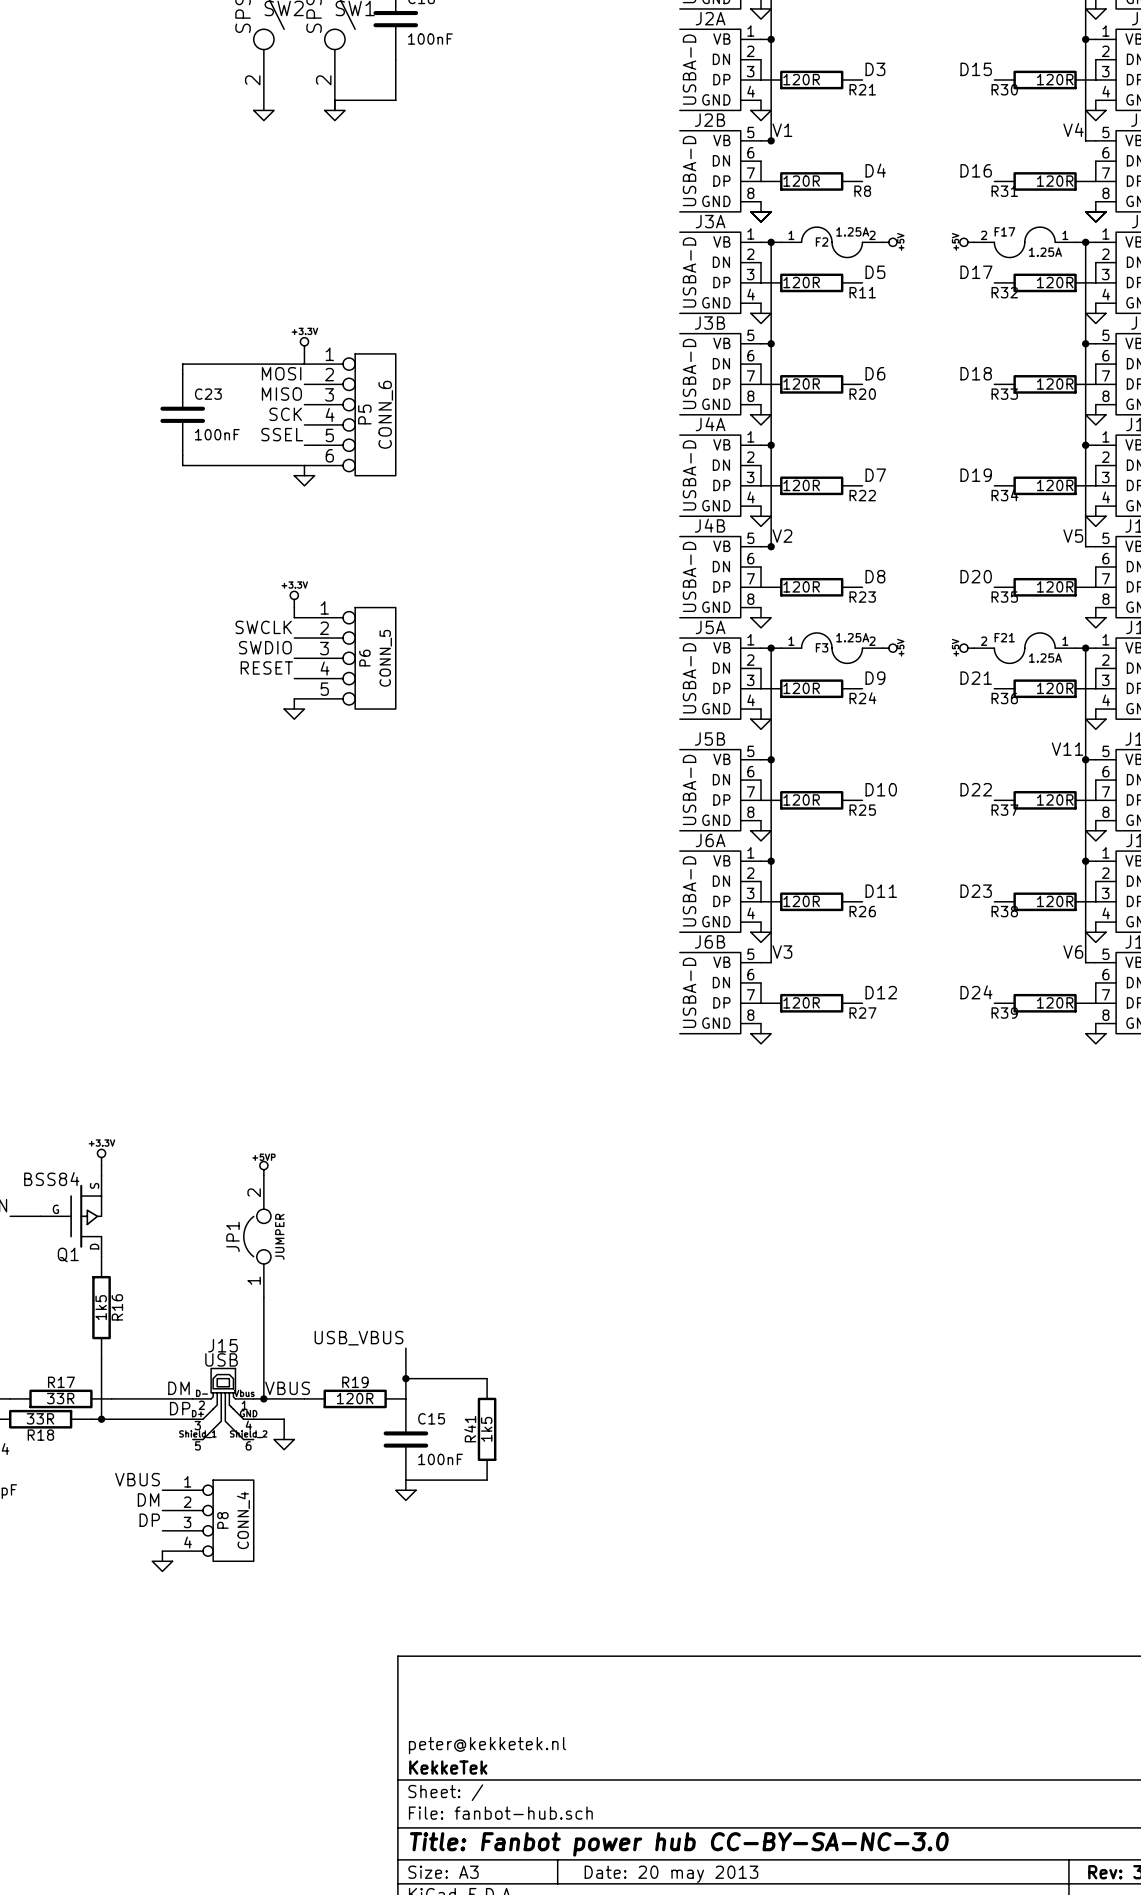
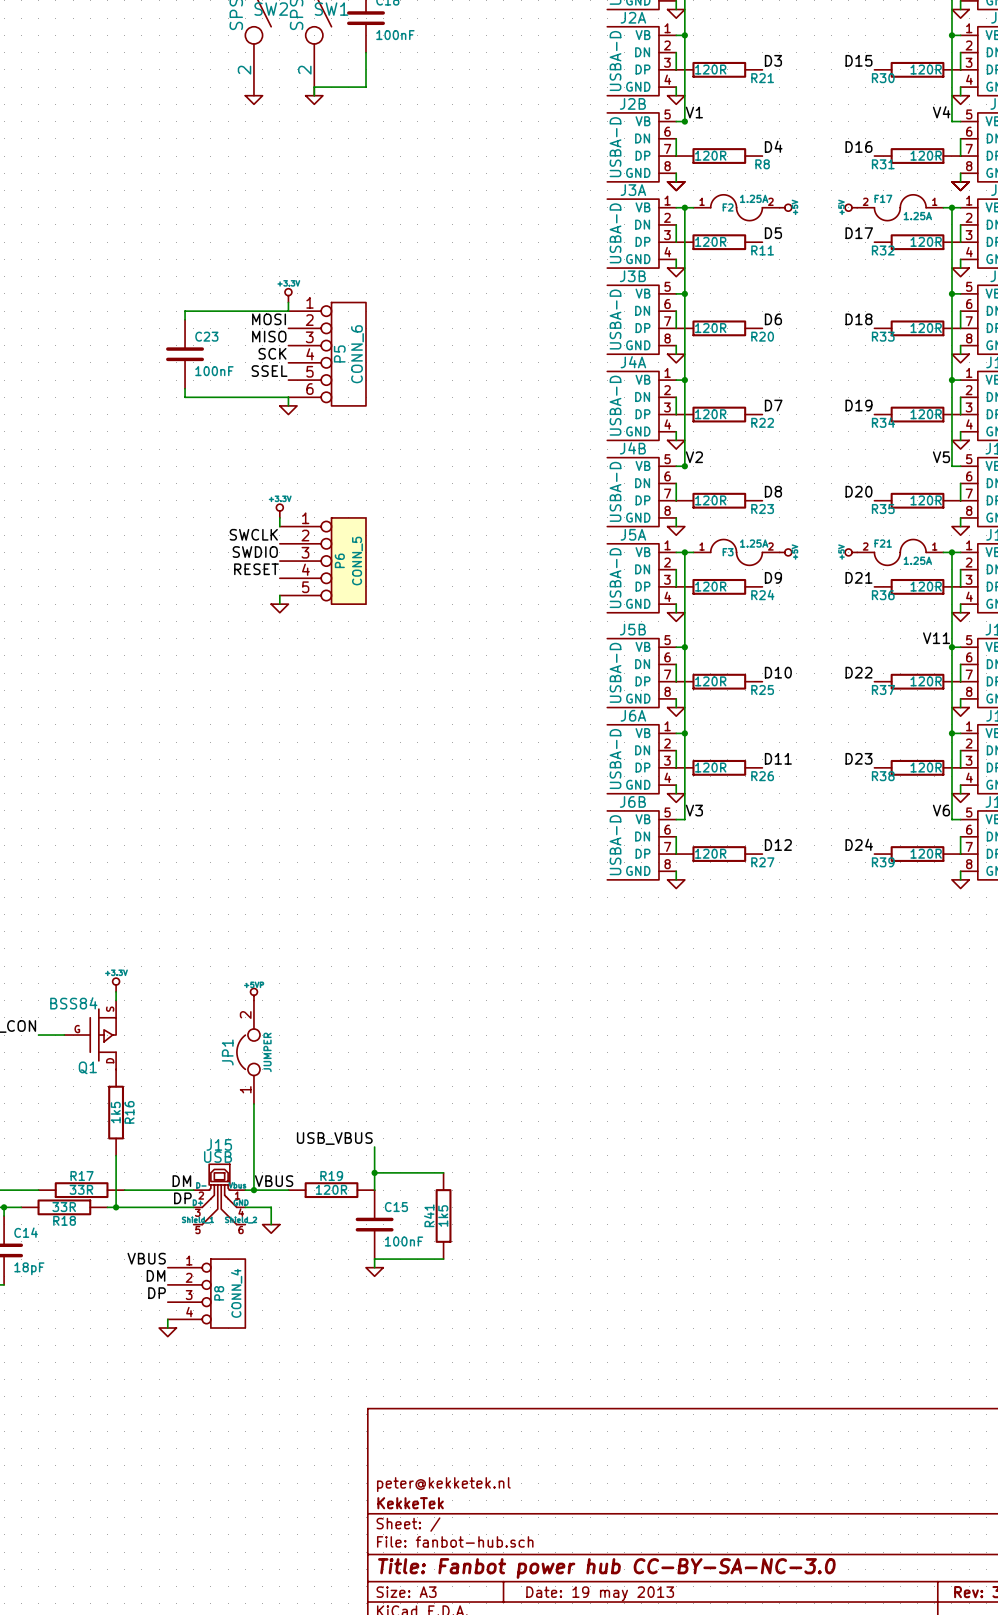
title block: Date: 20 may 2013 (671, 1874) -> Date: 19 may 2013 (600, 1593)

